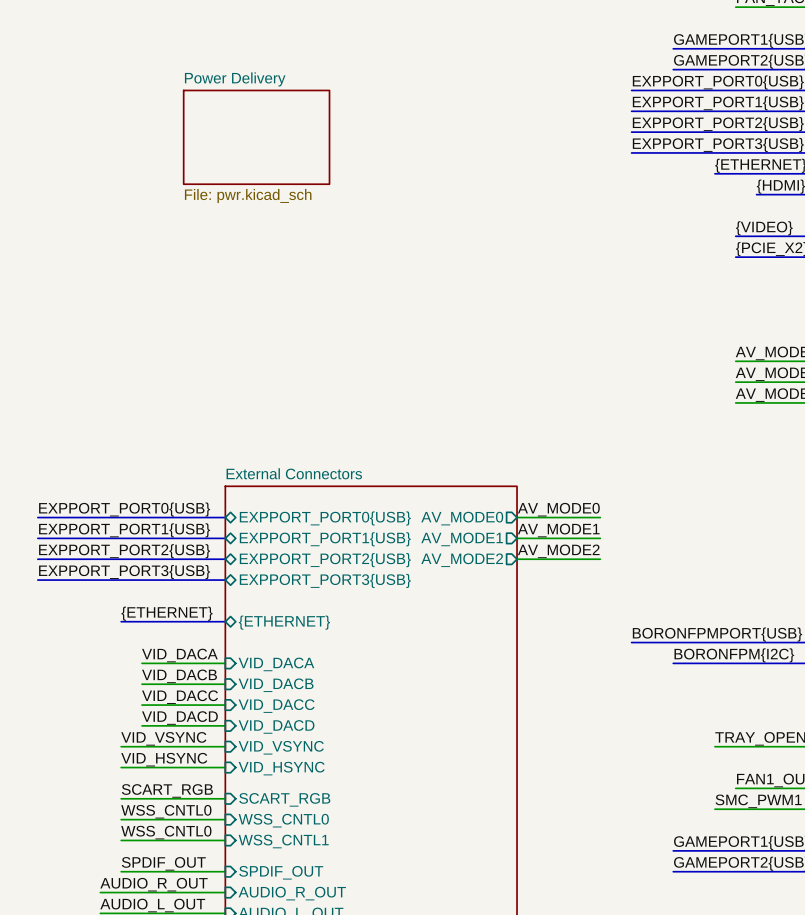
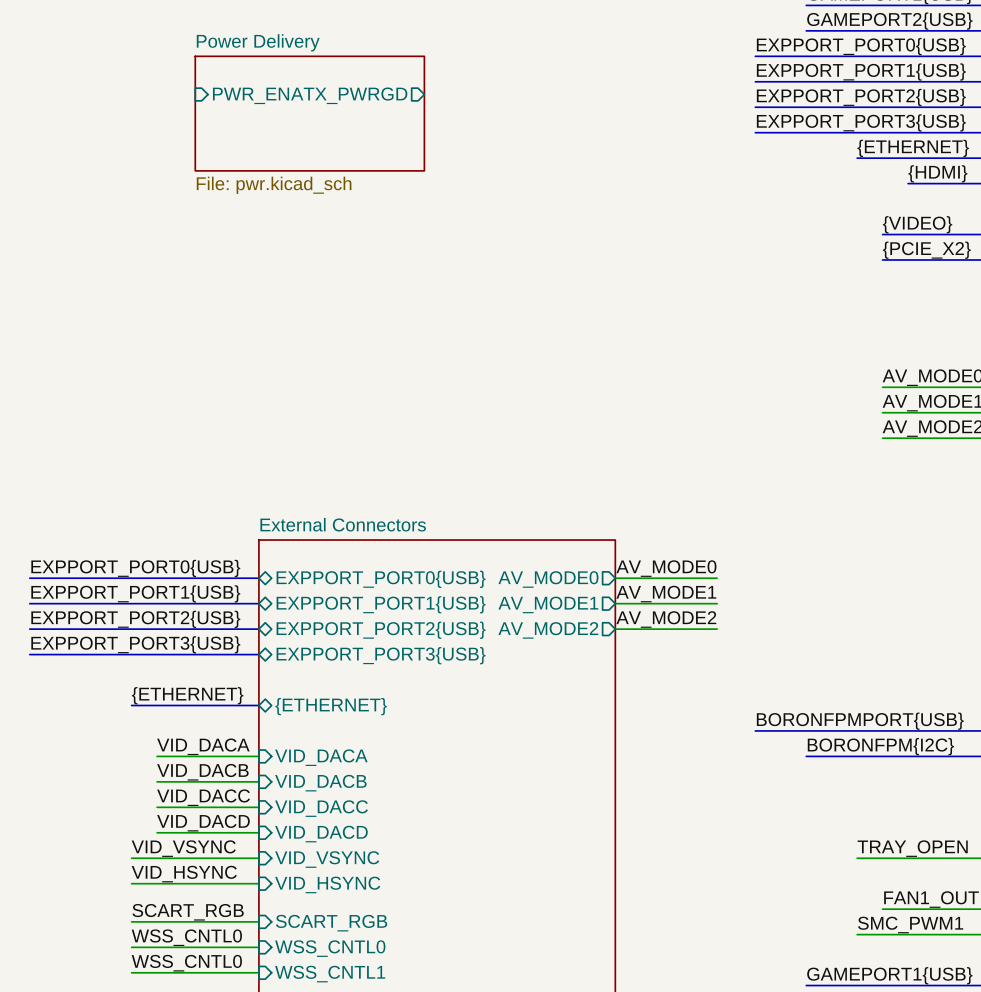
sheet pin: none -> PWR_EN (251, 95)
sheet pin: none -> ATX_PWRGD (349, 95)
sheet Power Delivery: File: pwr.kicad_sch (256, 137) -> none
sheet Power Delivery: none -> File: pwr.kicad_sch (309, 113)

